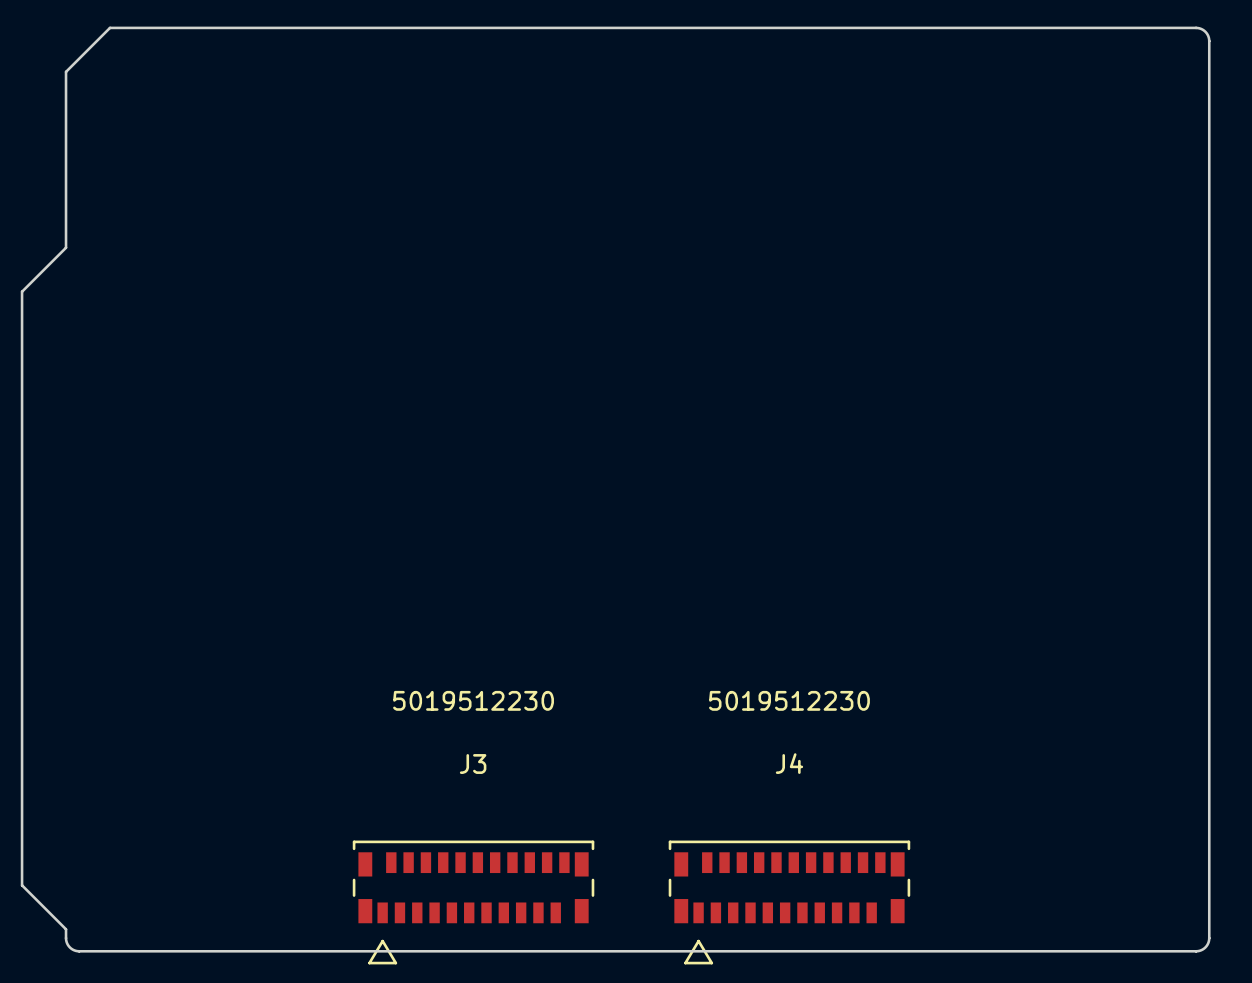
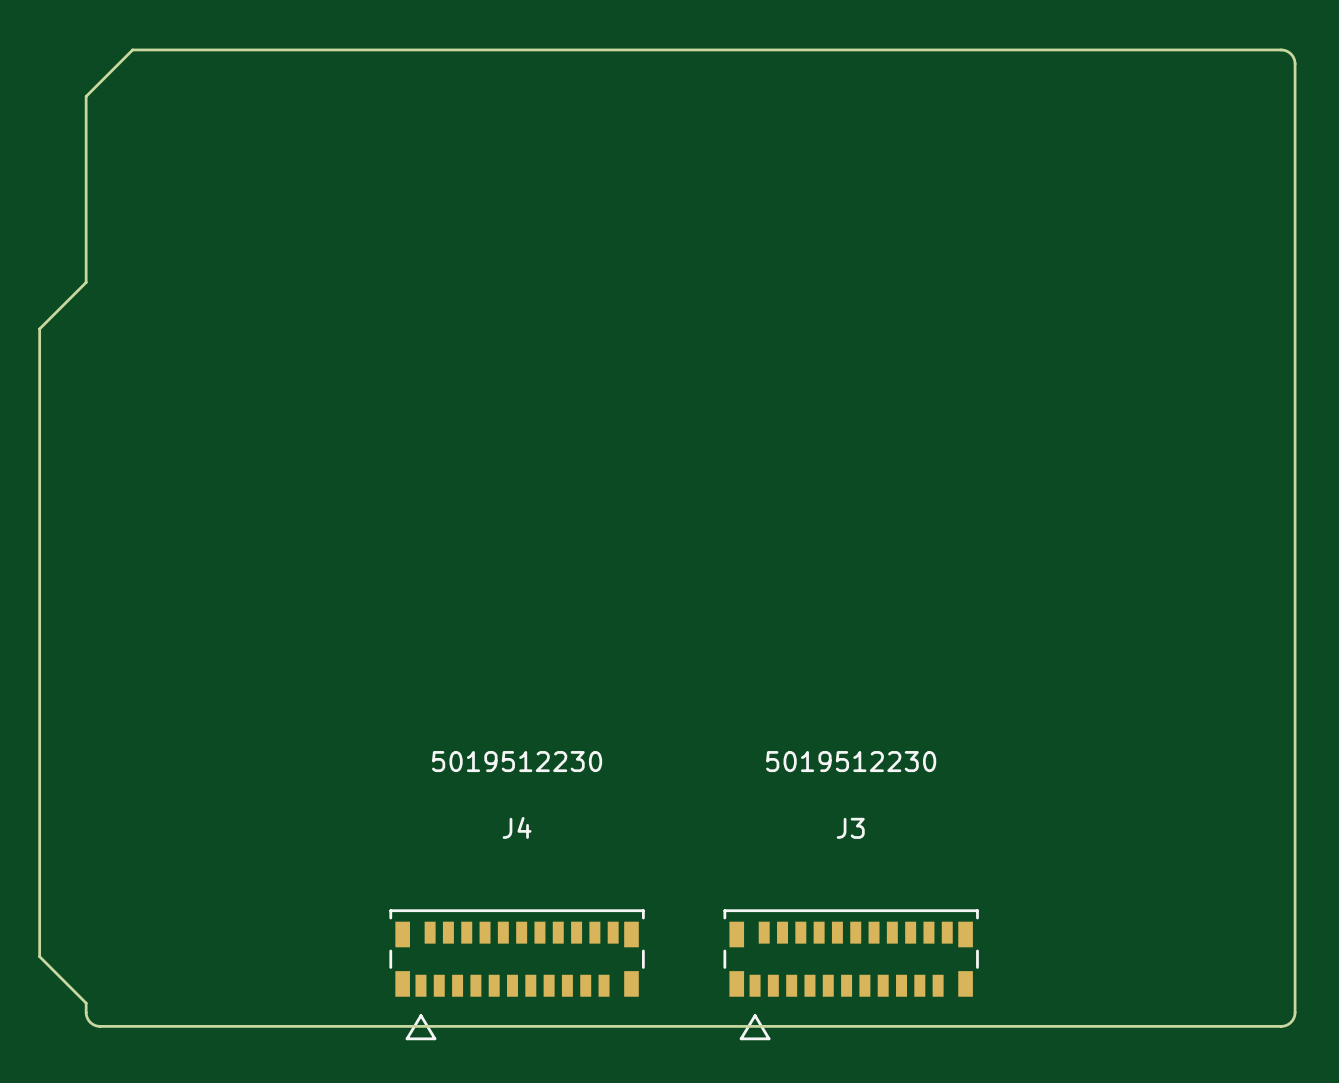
J4 name: J4 (789, 763) -> J3 (850, 828)
J3 name: J3 (473, 764) -> J4 (517, 827)

